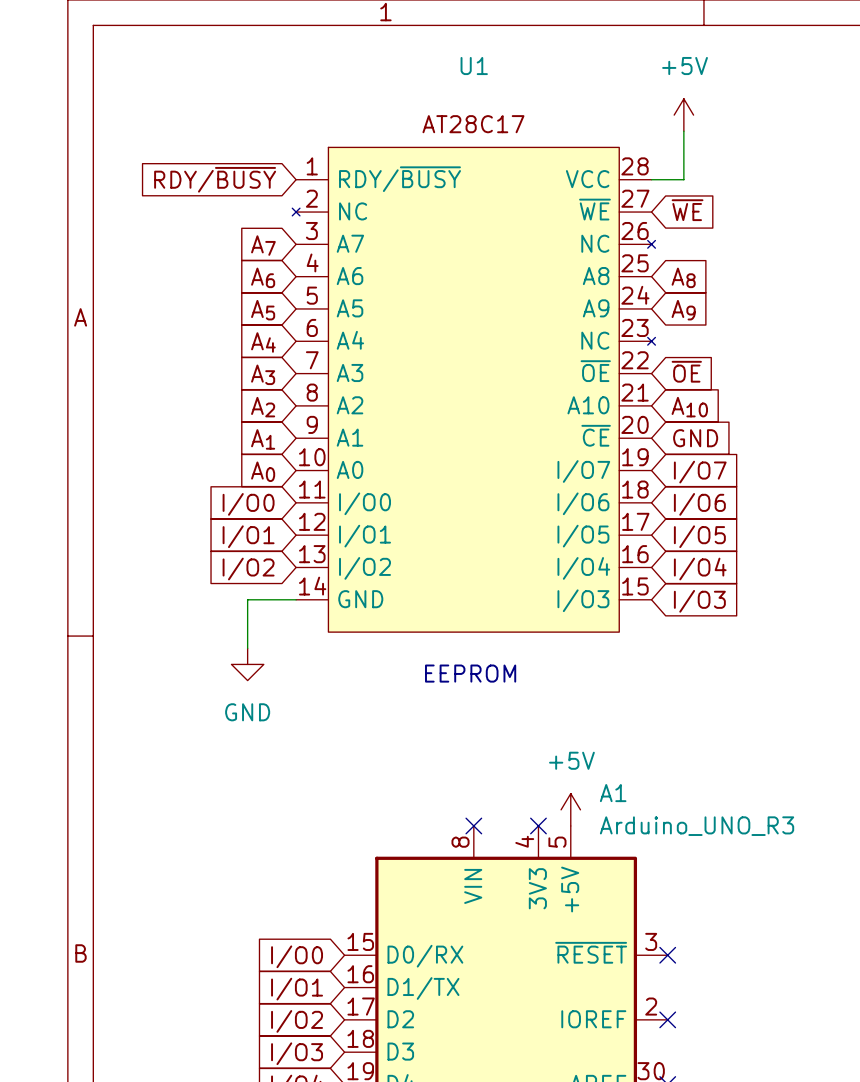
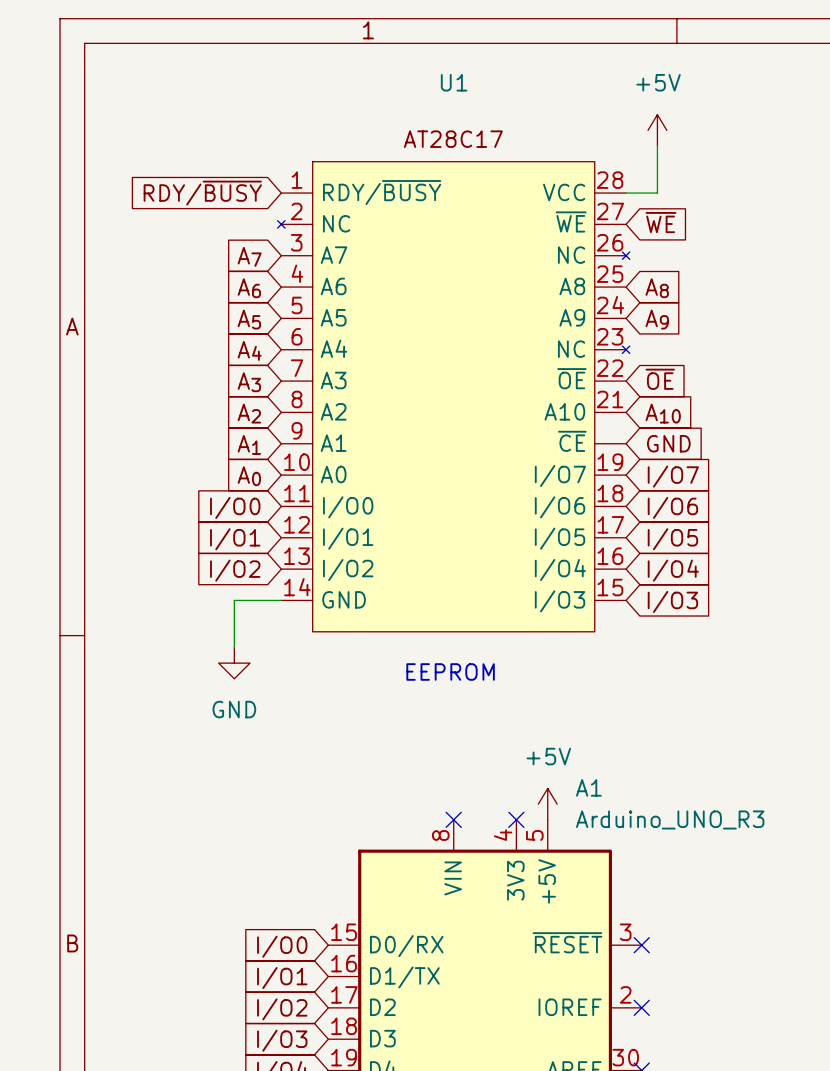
U1 pin number: 20 (635, 424) -> none

